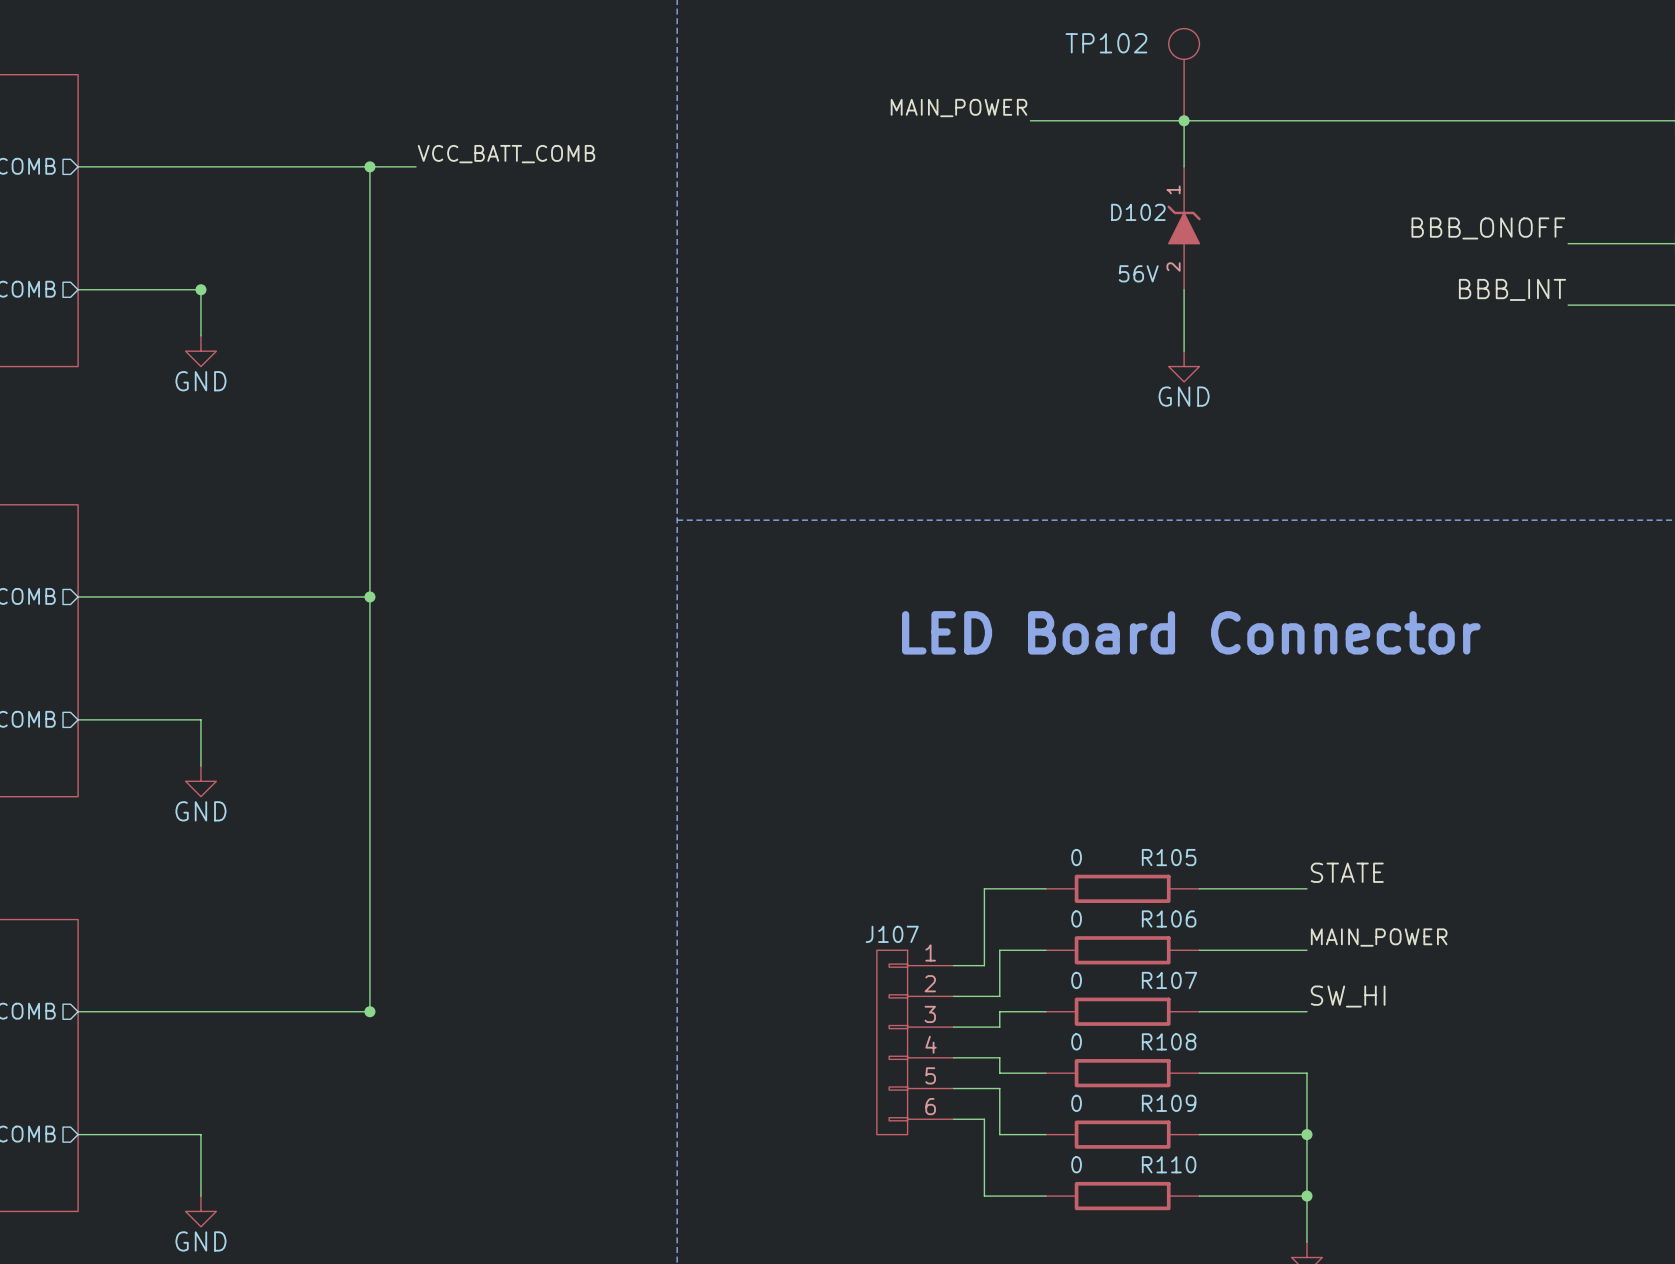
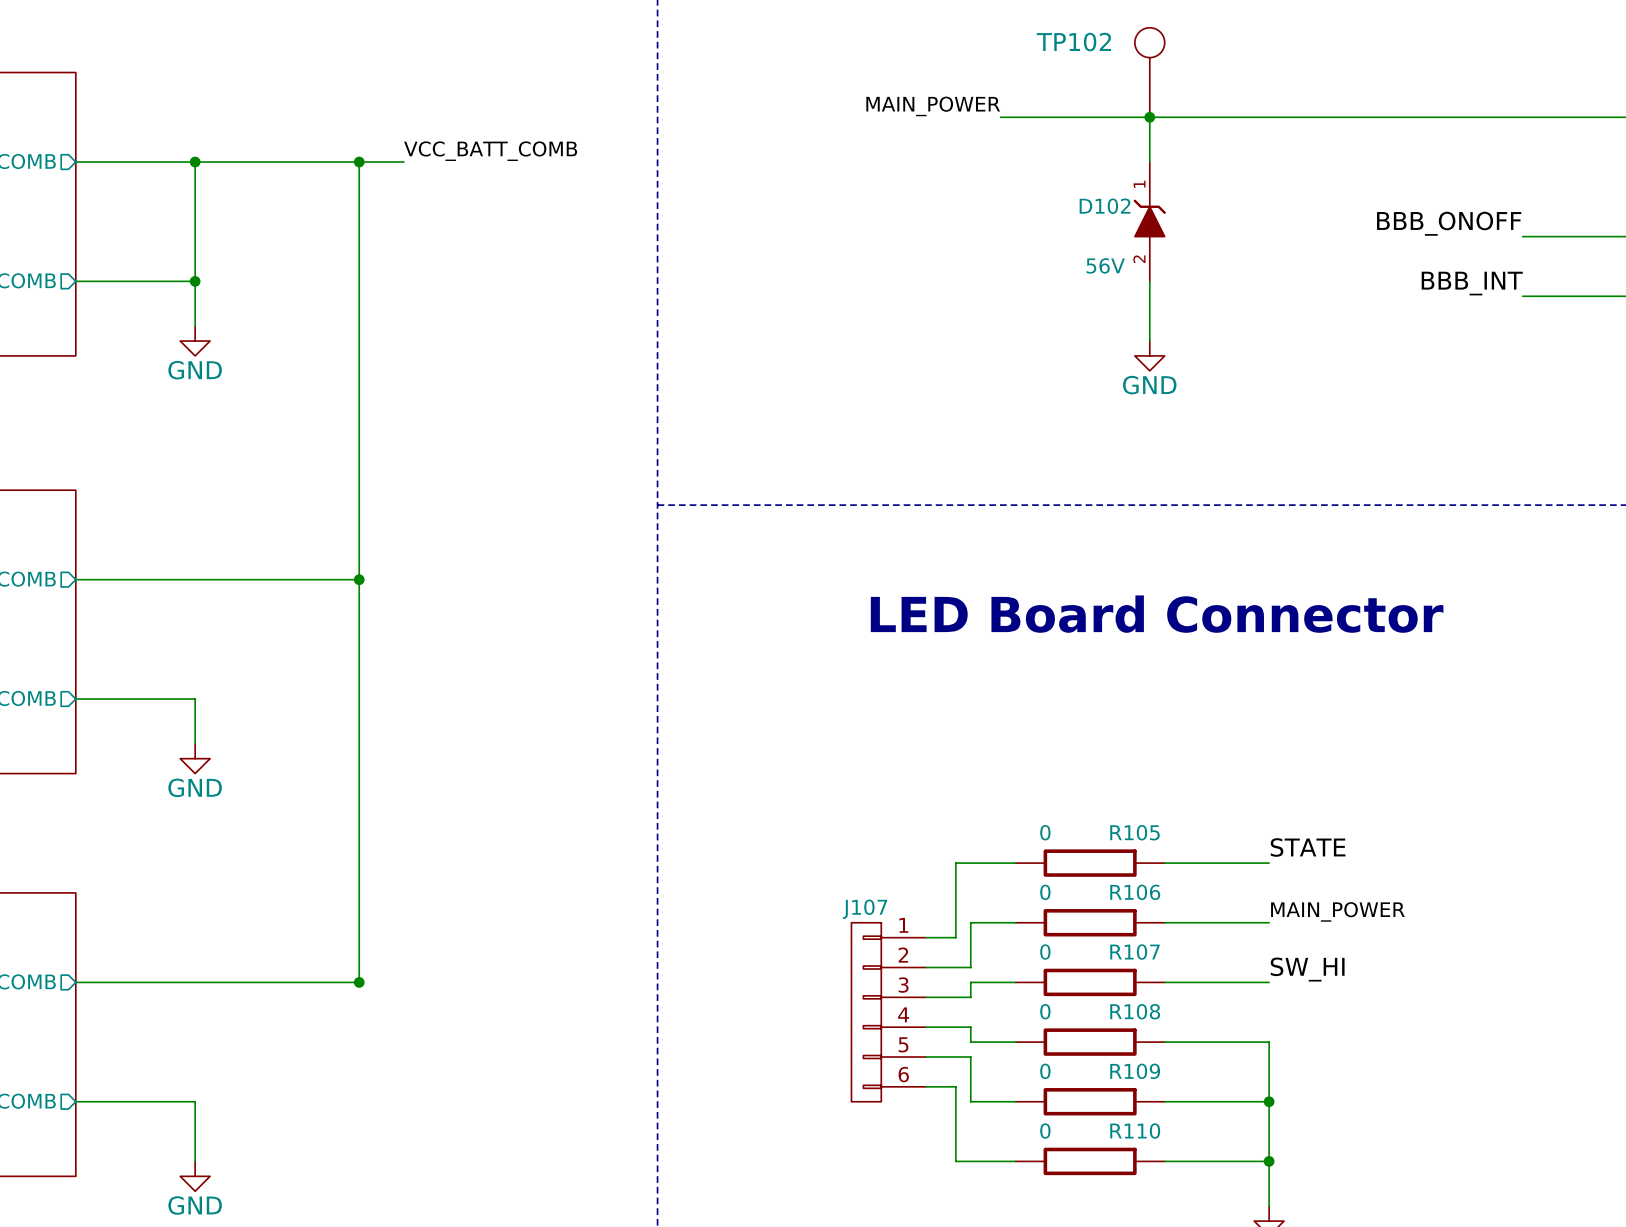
wire: none -> (195, 162) (195, 281)
junction: none -> (195, 162)

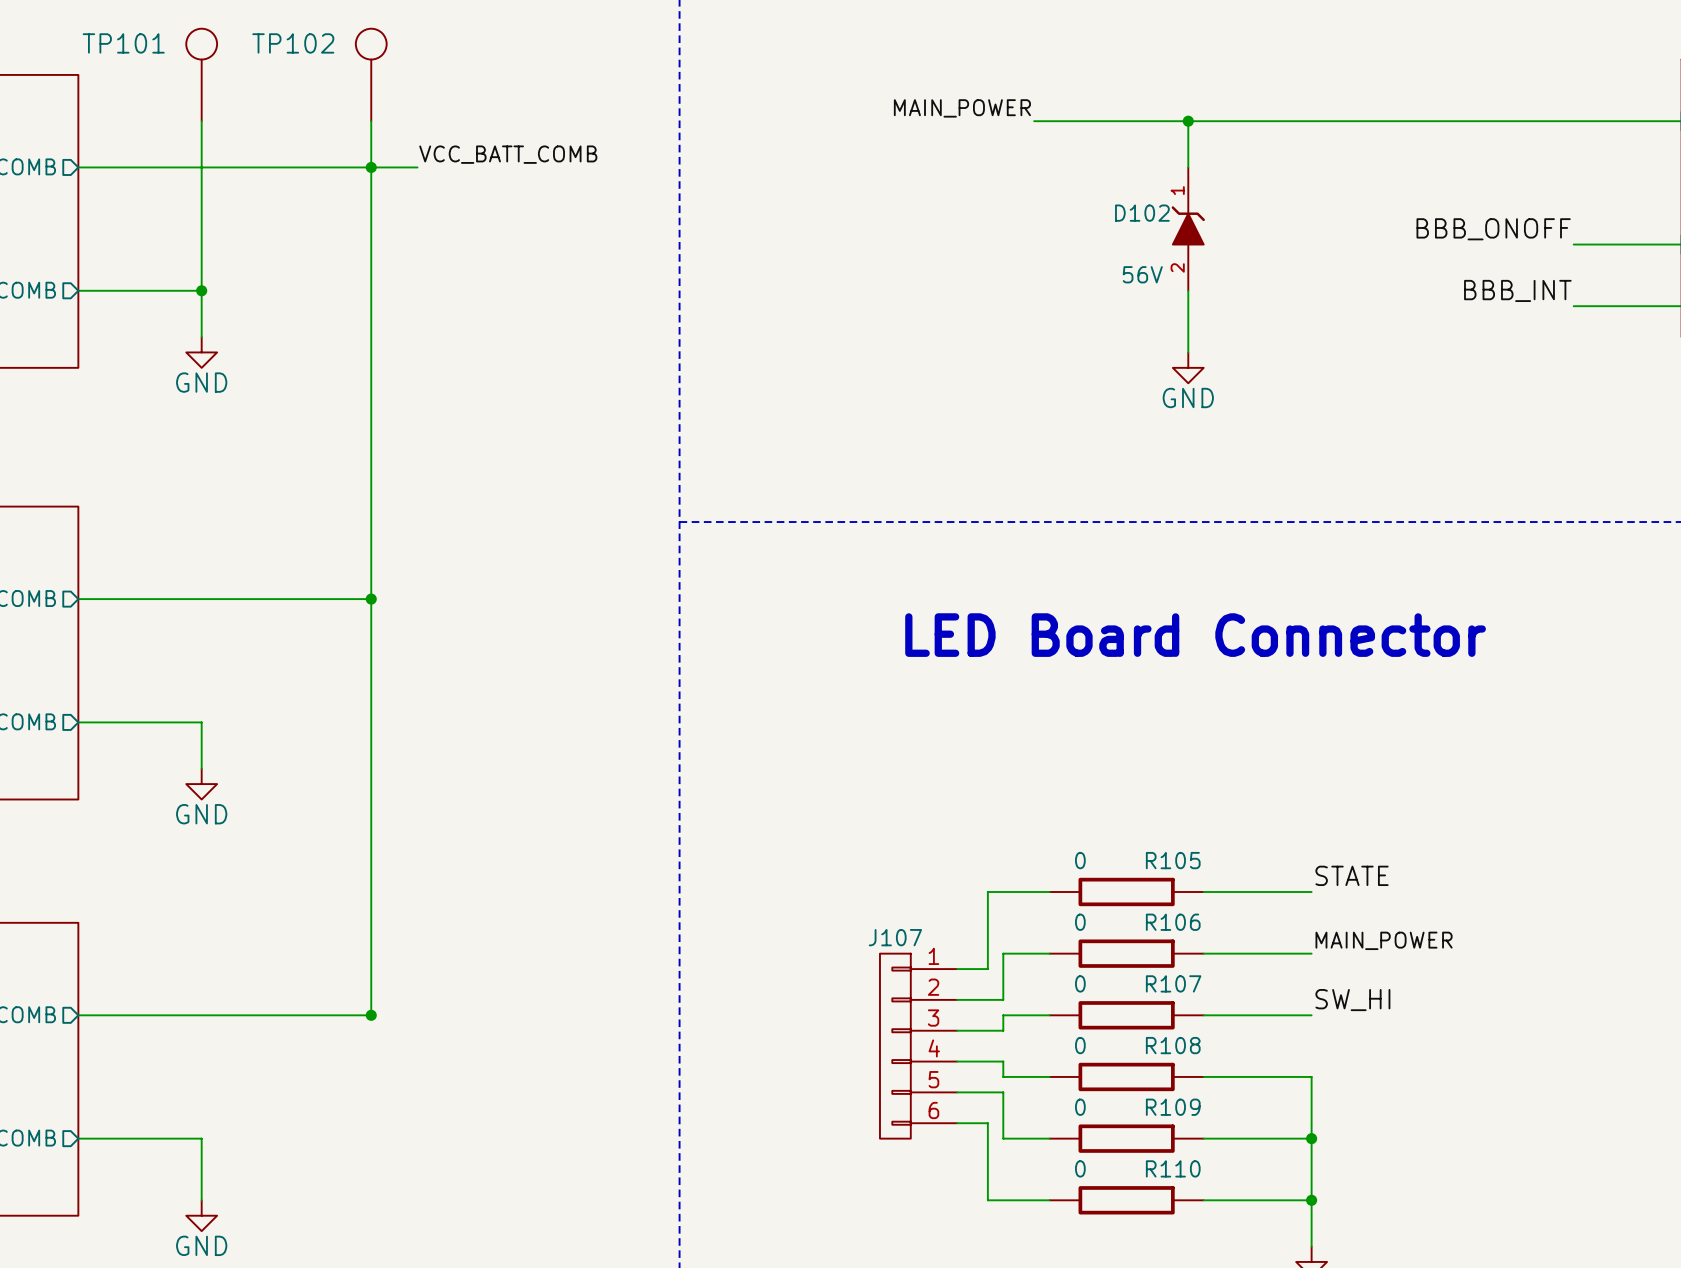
TP101: none -> (201, 74)
TP102 position: (1149, 72) -> (371, 74)
wire: none -> (201, 121) (201, 167)
wire: none -> (371, 121) (371, 167)
junction: (195, 162) -> none

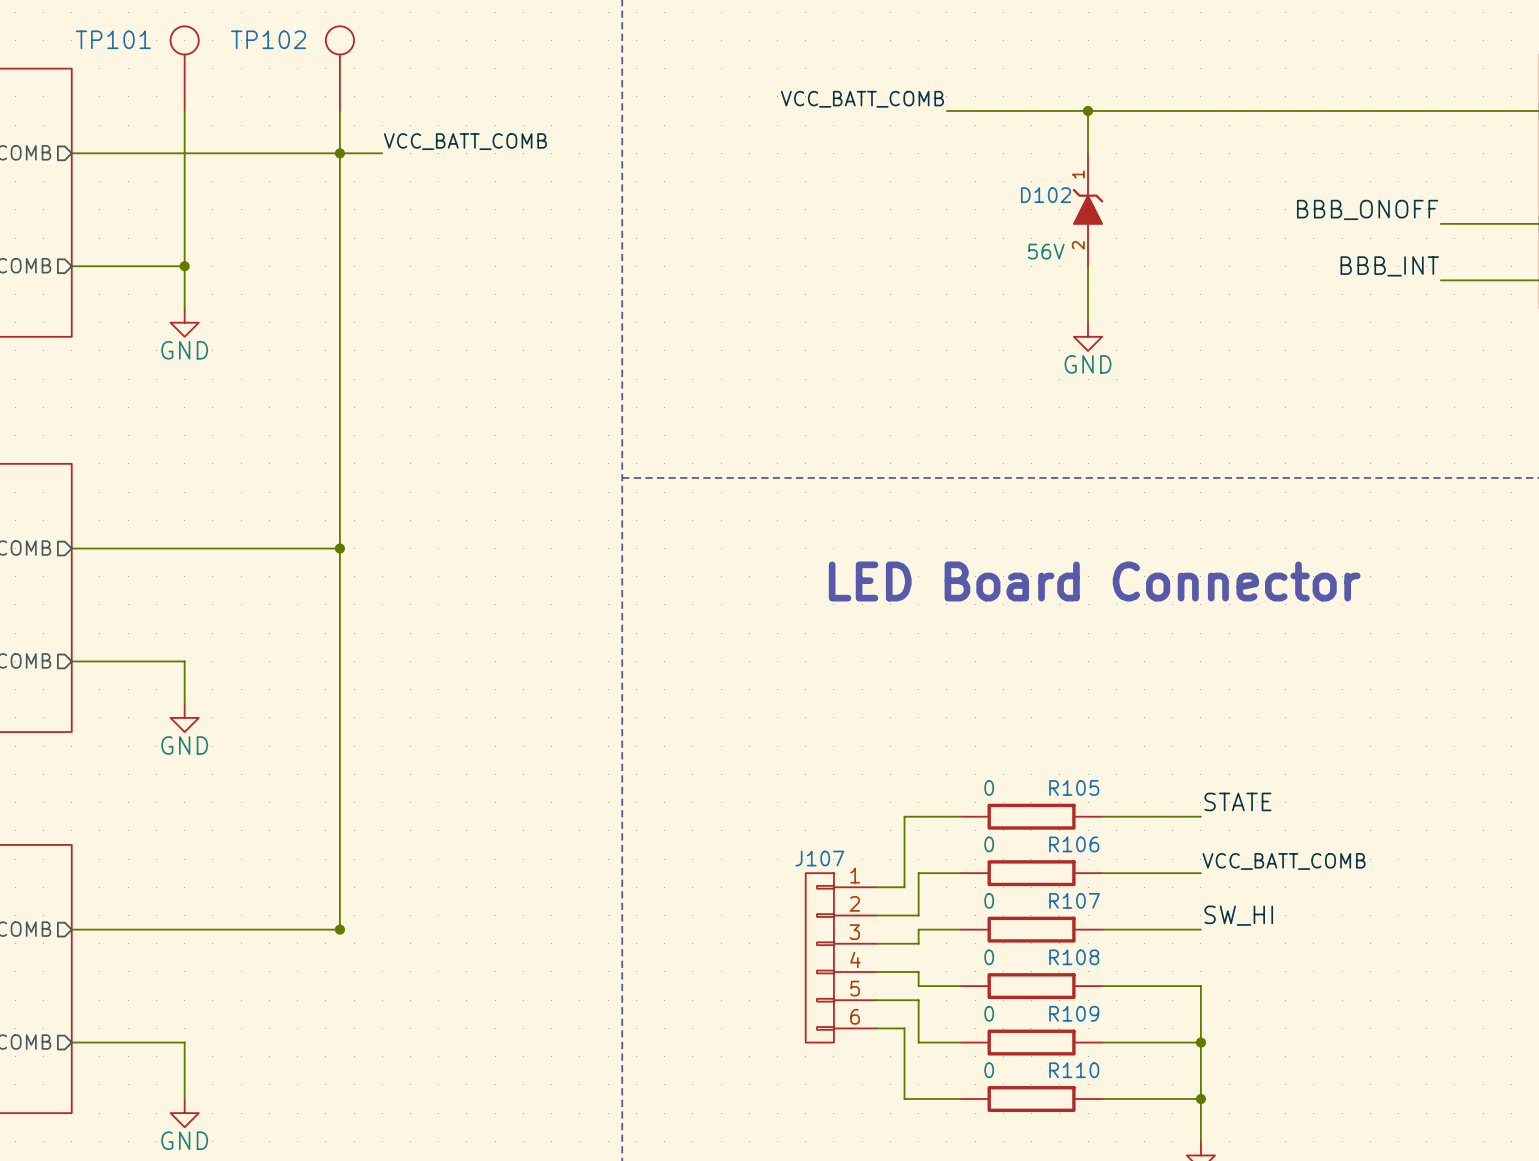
label: MAIN_POWER (962, 108) -> VCC_BATT_COMB (862, 99)
label: MAIN_POWER (1384, 940) -> VCC_BATT_COMB (1284, 861)

